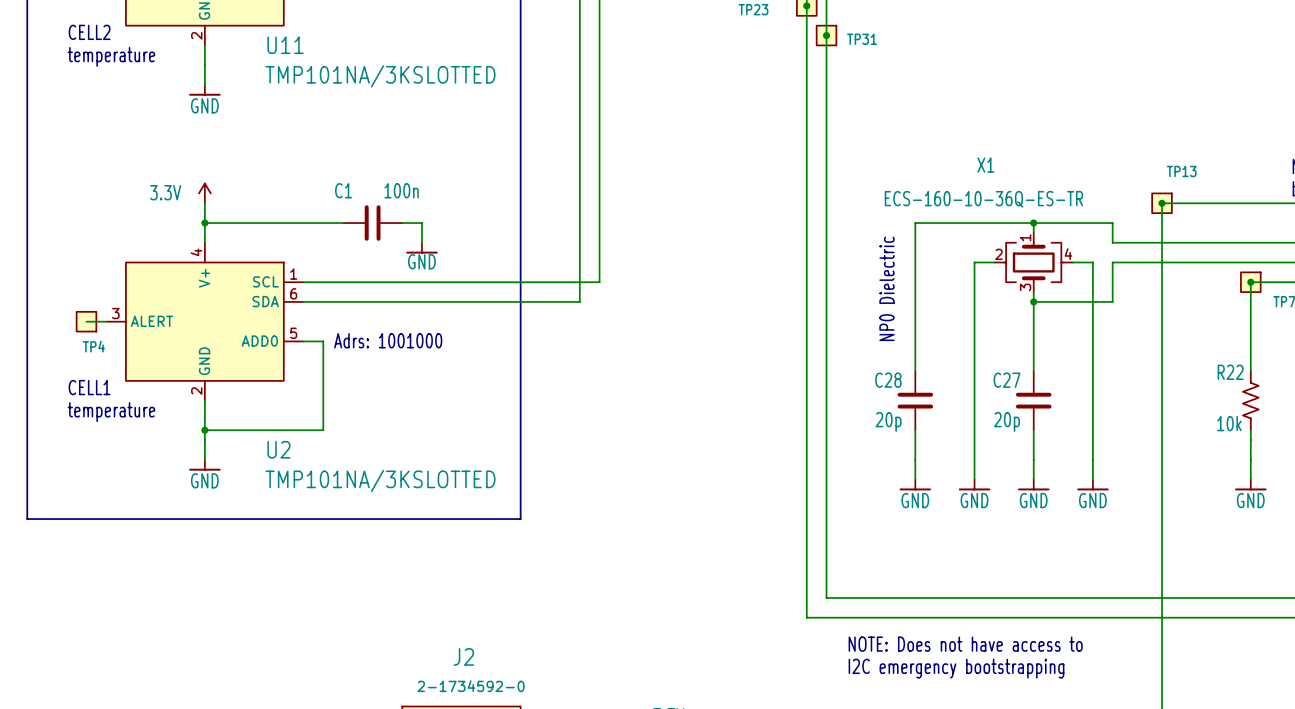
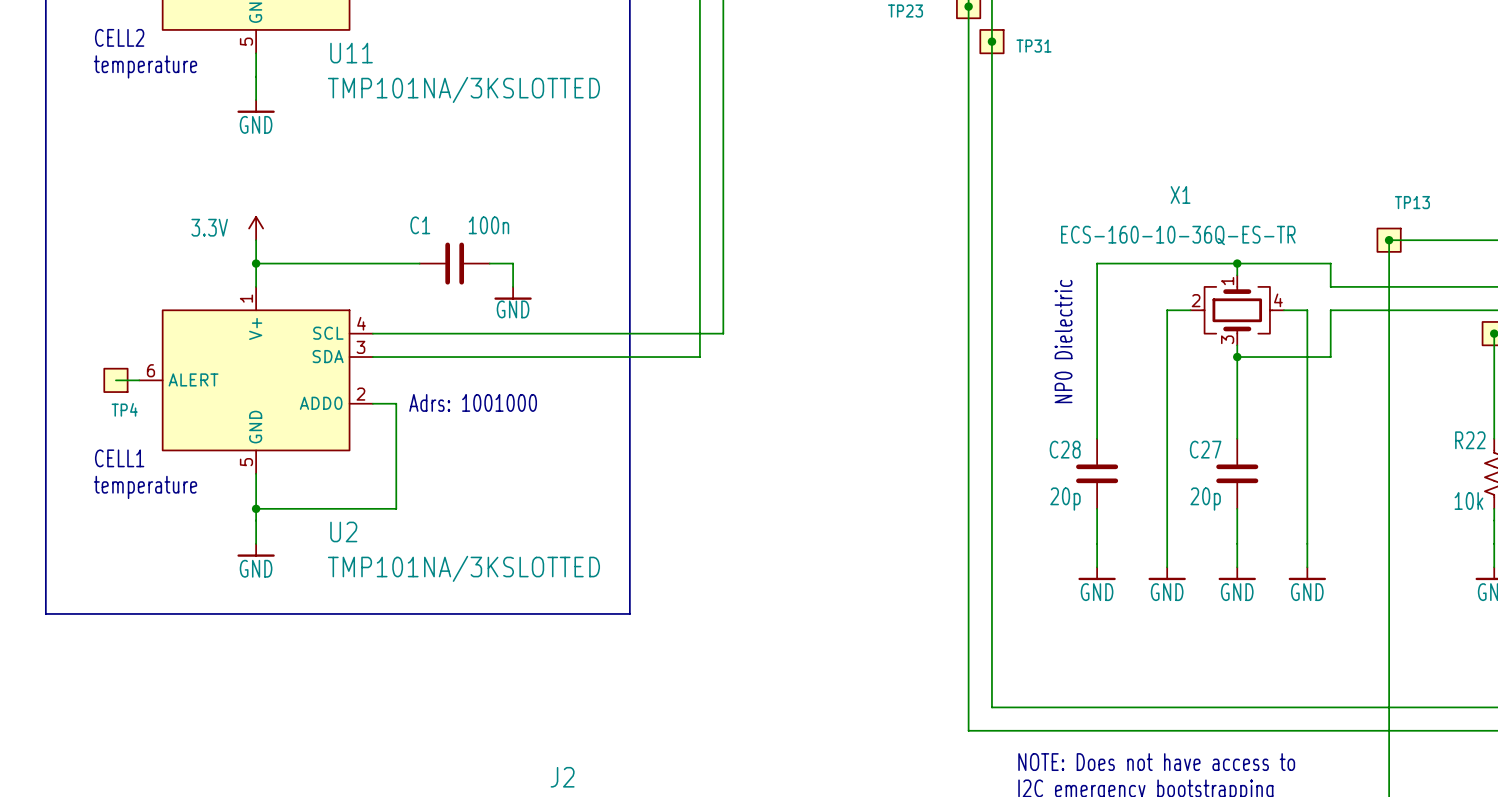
U11 pin number: 2 (196, 35) -> 5 (246, 41)
U2 pin number: 4 (196, 252) -> 1 (246, 298)
U2 pin number: 1 (293, 274) -> 4 (361, 323)
U2 pin number: 6 (293, 293) -> 3 (360, 347)
U2 pin number: 3 (115, 313) -> 6 (150, 370)
U2 pin number: 5 (293, 333) -> 2 (360, 394)
U2 pin number: 2 (196, 390) -> 5 (246, 462)

